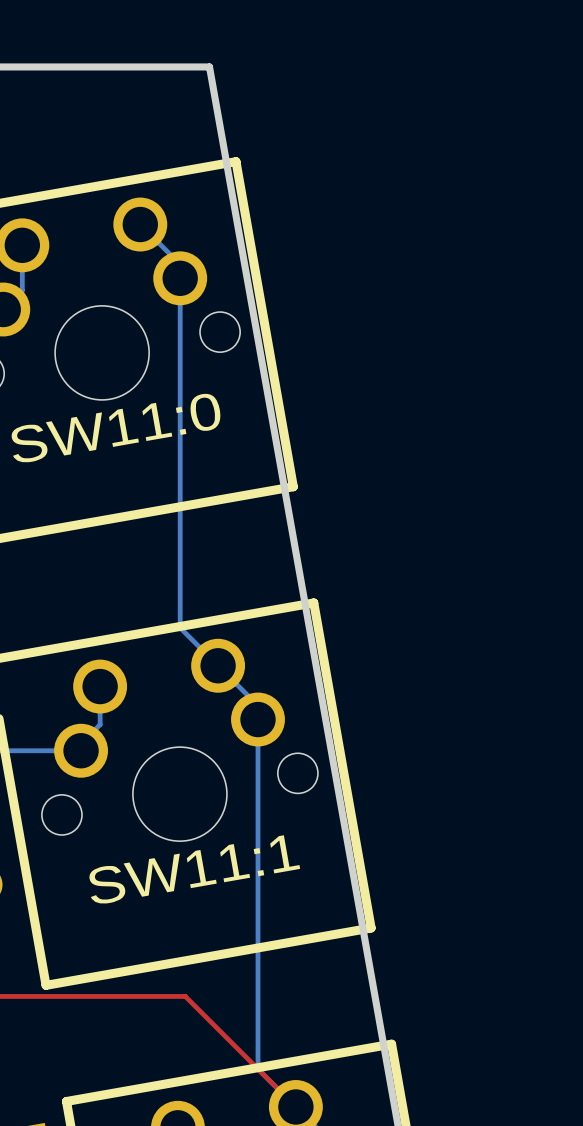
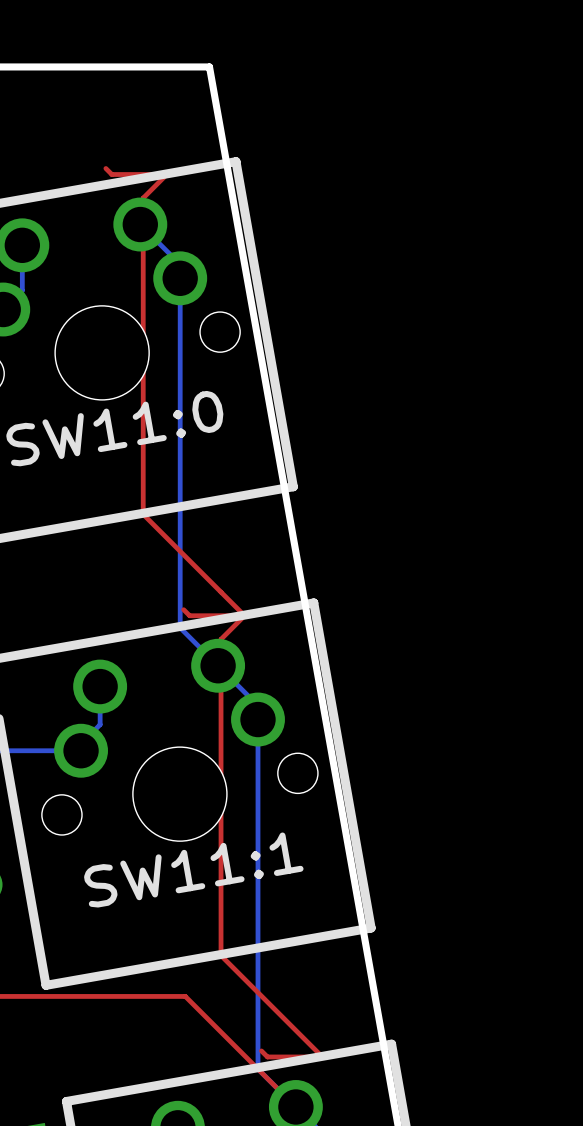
top track: none -> (105, 168) (111, 174) (166, 174) (143, 198) (143, 514) (244, 615)
top track: none -> (183, 609) (189, 615) (244, 615)
top track: none -> (244, 615) (221, 639) (221, 955) (322, 1056) (267, 1056) (261, 1050)

